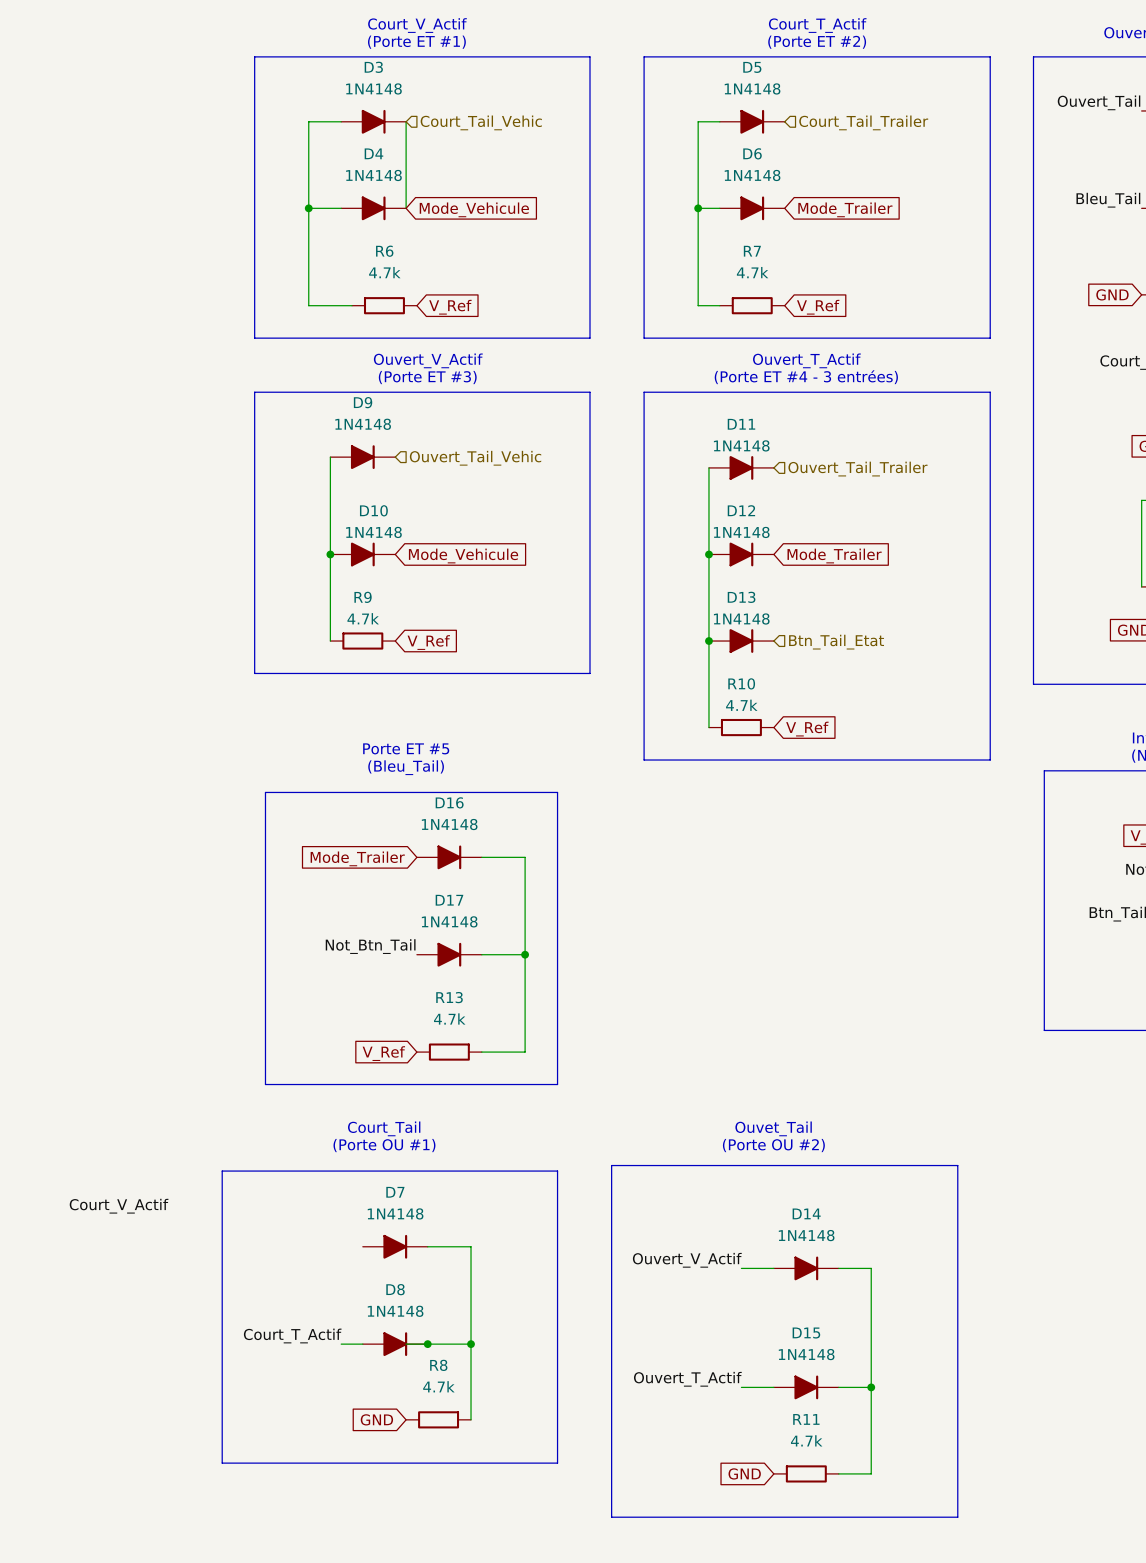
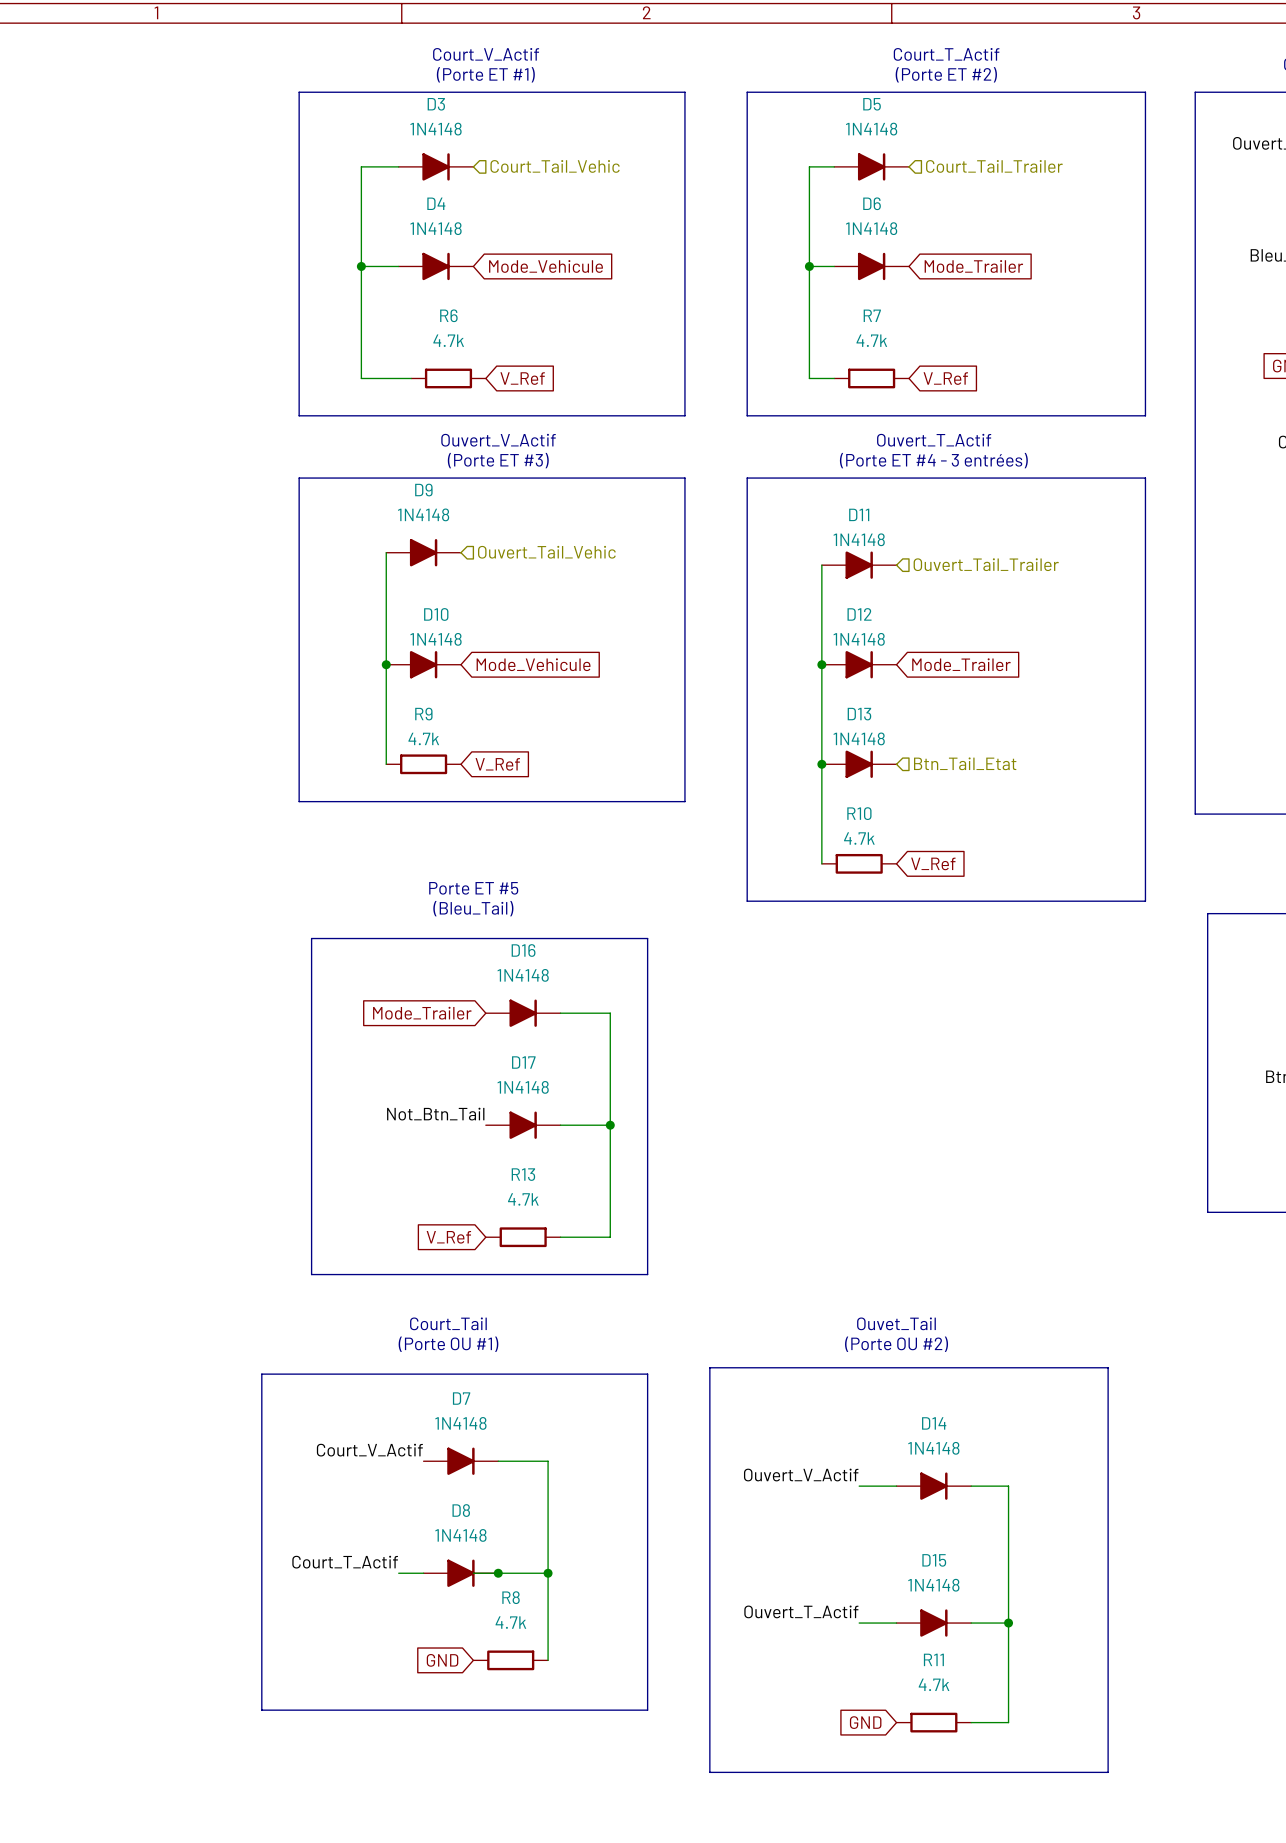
wire: (406, 121) (406, 208) -> none
label position: Court_V_Actif (119, 1206) -> Court_V_Actif (369, 1450)

